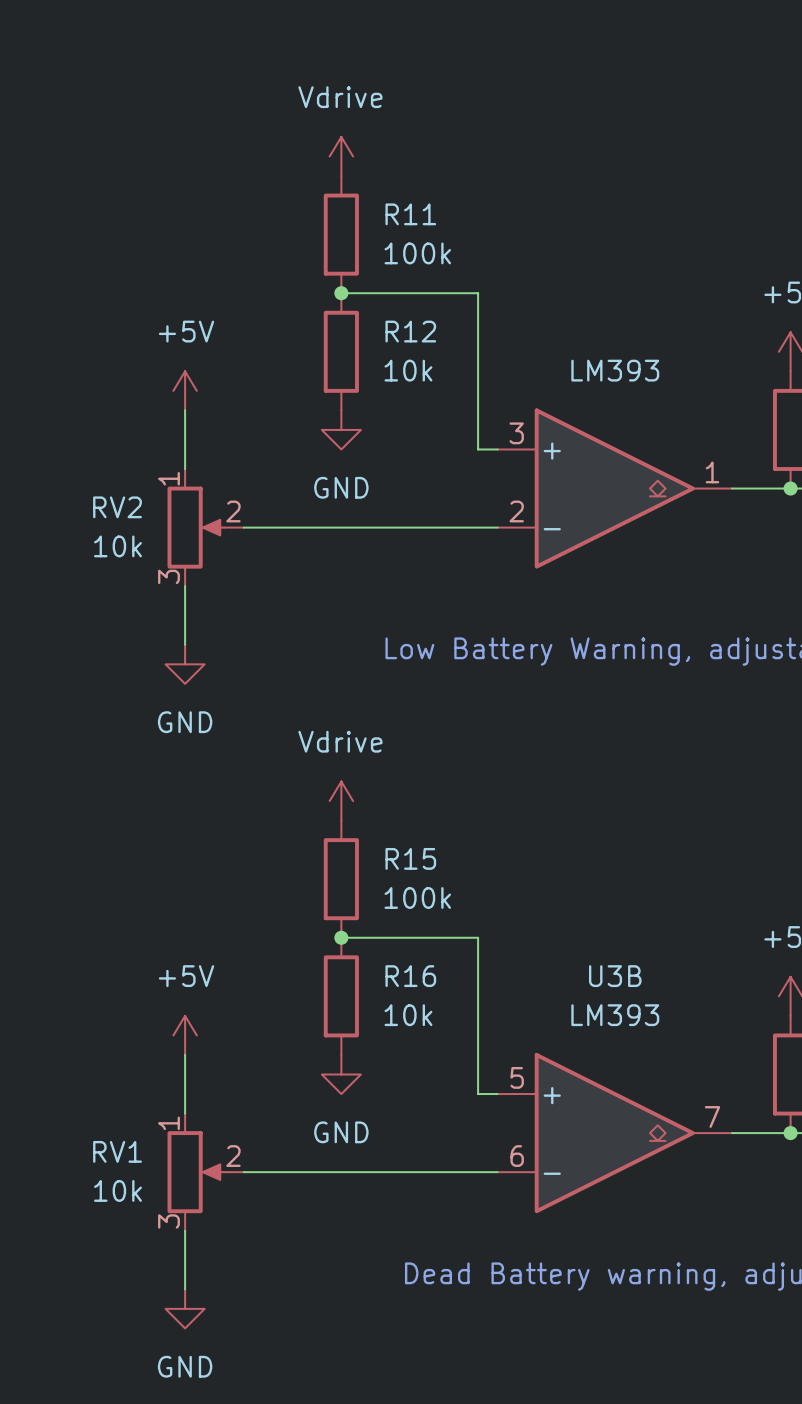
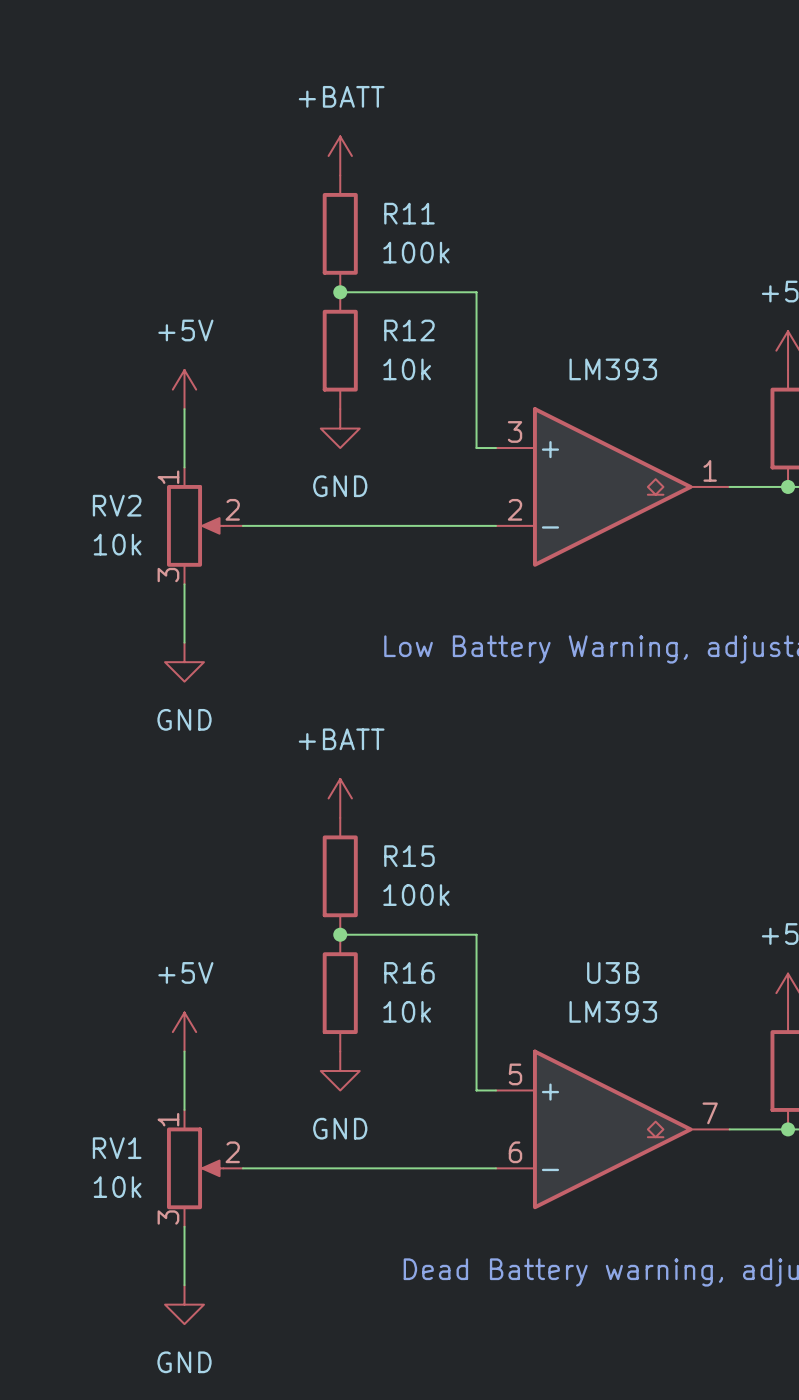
power symbol: Vdrive (341, 156) -> +BATT (340, 155)
power symbol: Vdrive (341, 801) -> +BATT (340, 798)

